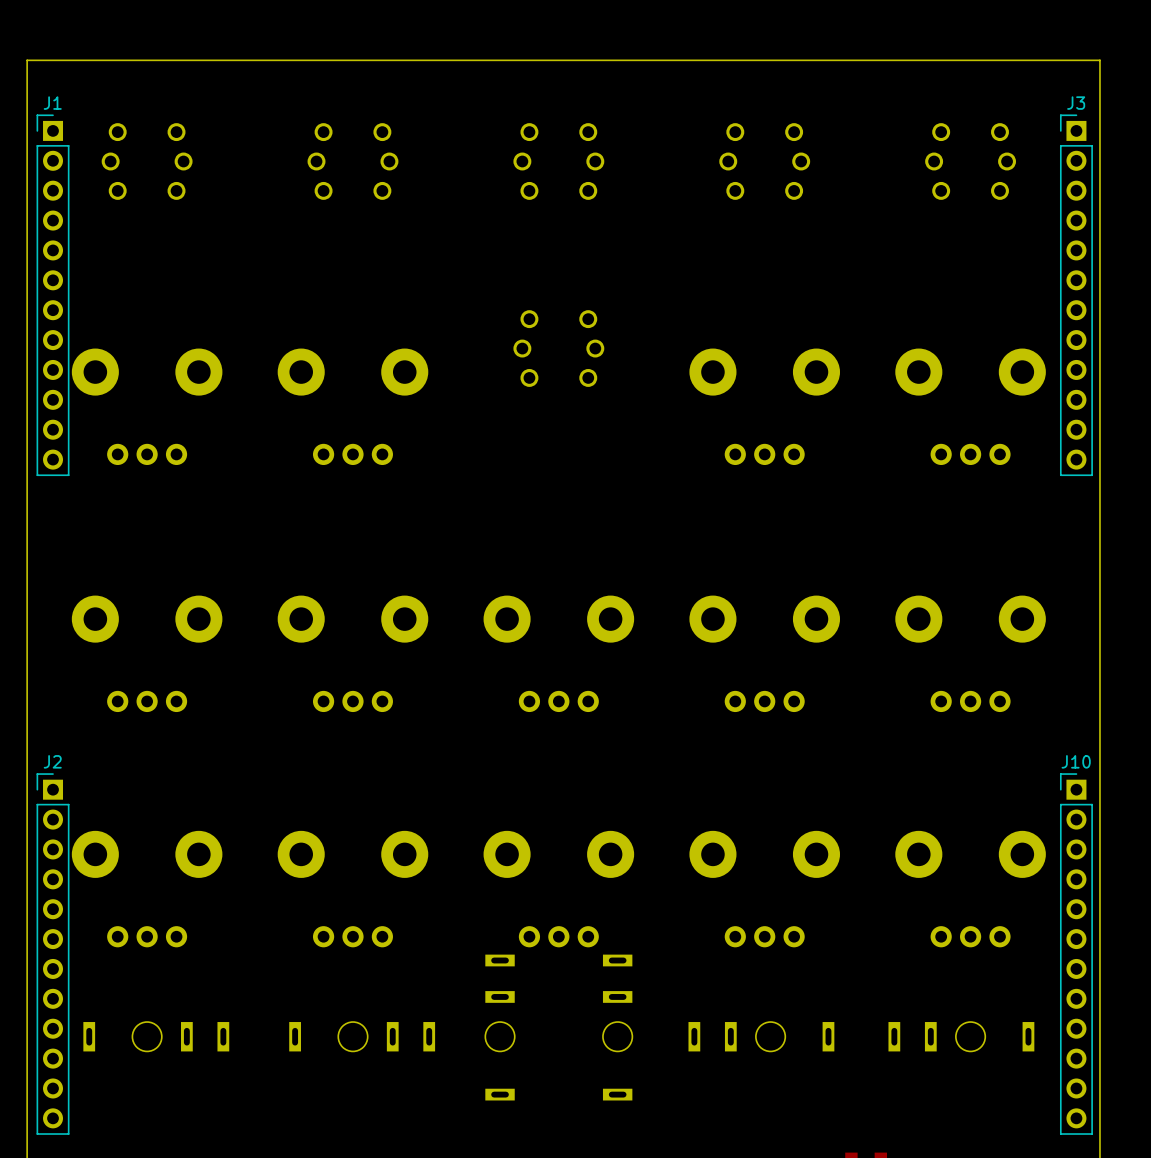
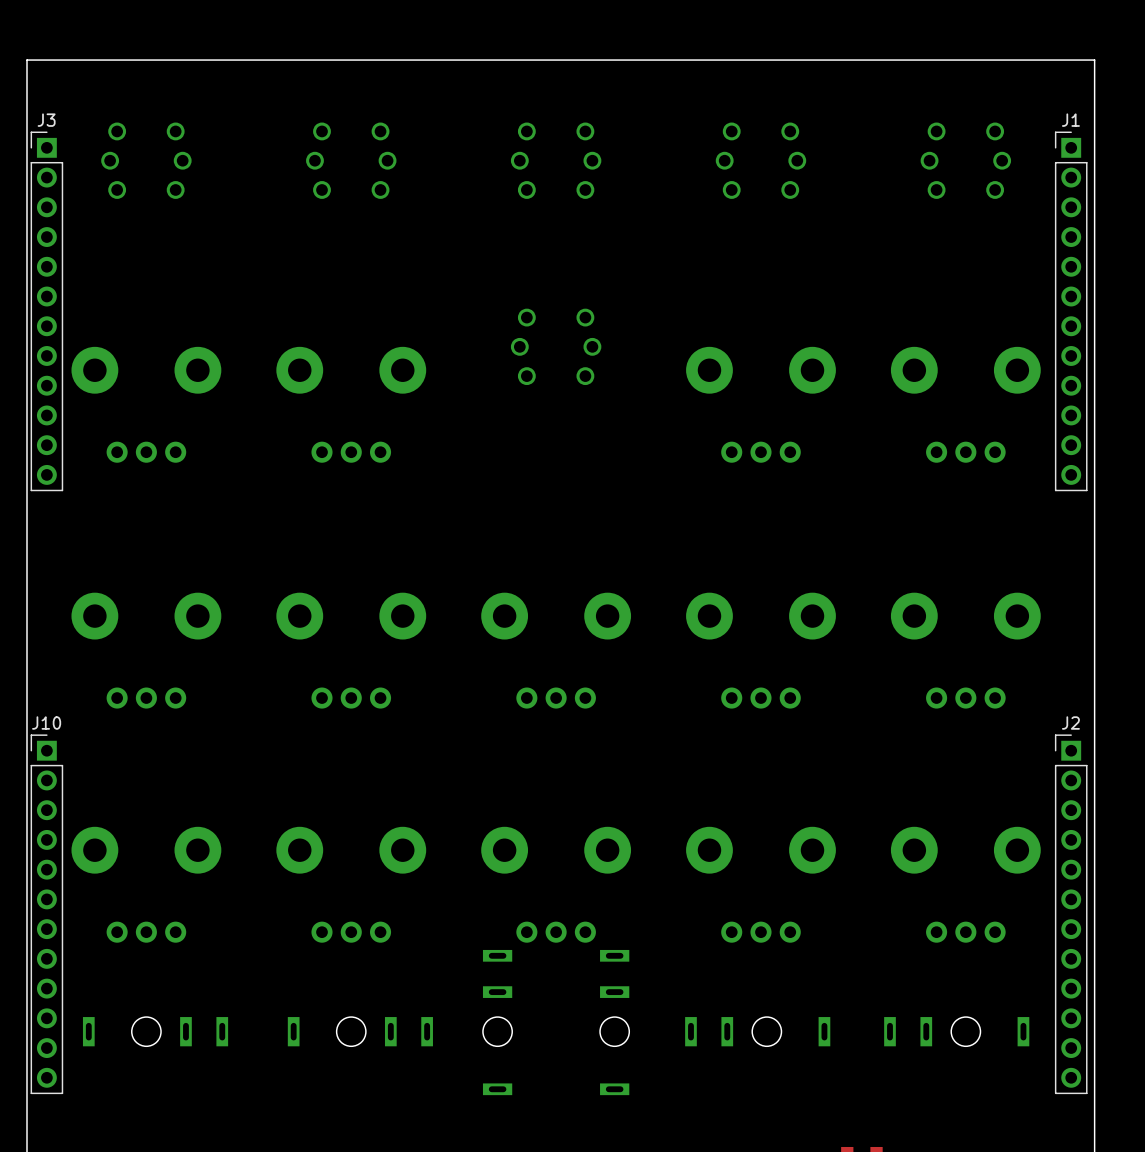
J1 position: (53, 295) -> (1071, 311)
J3 position: (1076, 295) -> (46, 311)
J2 position: (53, 954) -> (1071, 914)
J10 position: (1076, 954) -> (46, 914)

